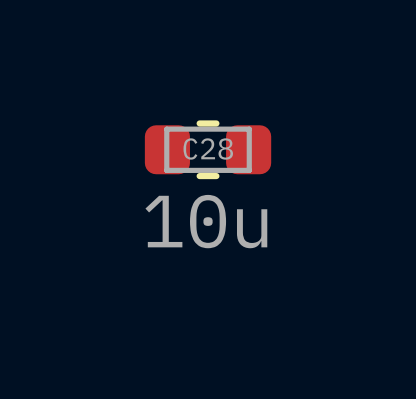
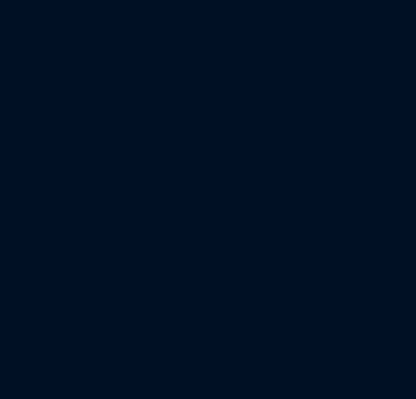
C28: 10u (208, 149) -> none

